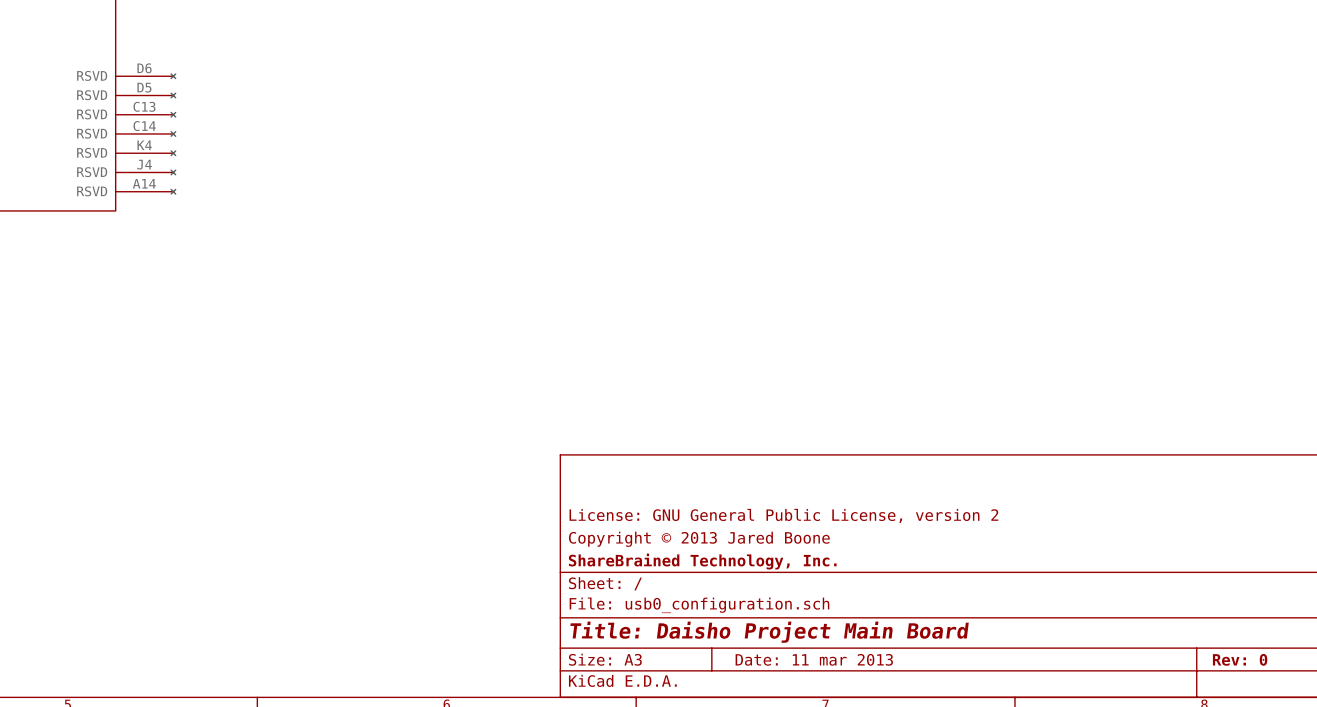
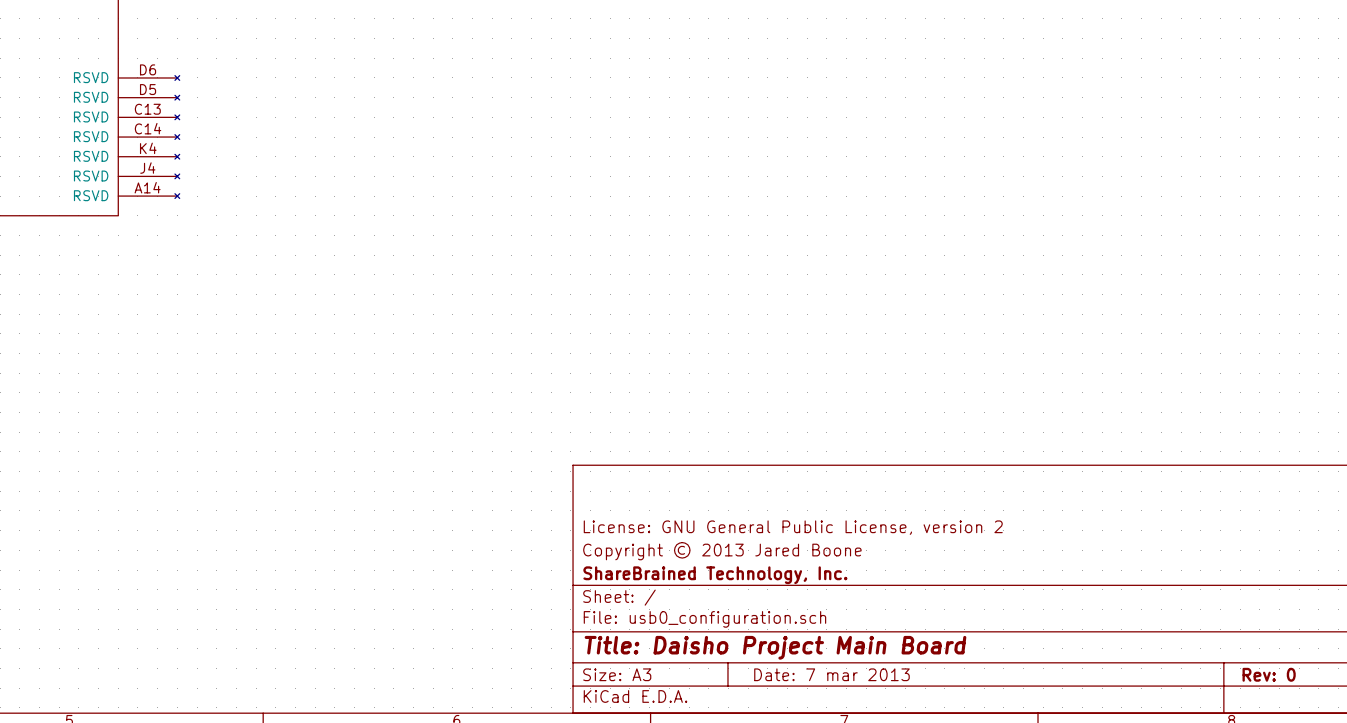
title block: Date: 11 mar 2013 (814, 659) -> Date: 7 mar 2013 (831, 674)

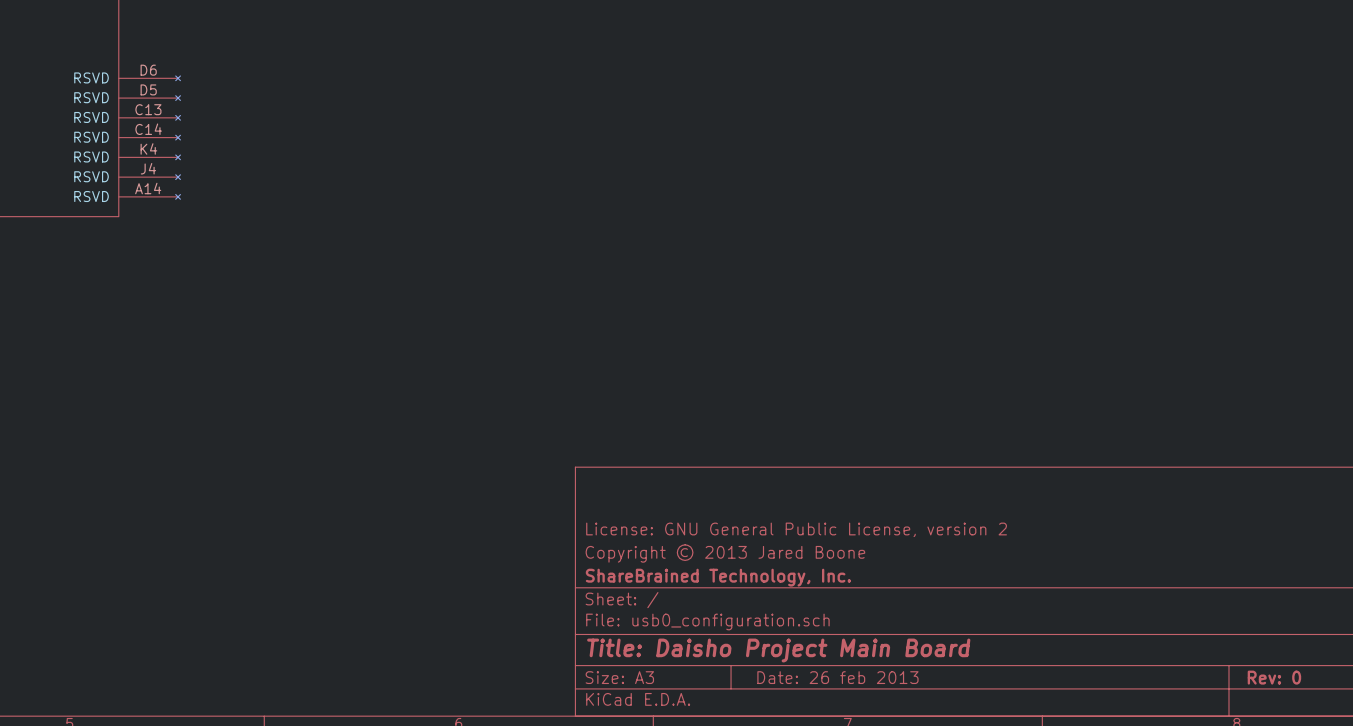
title block: Date: 7 mar 2013 (831, 674) -> Date: 26 feb 2013 (837, 677)

